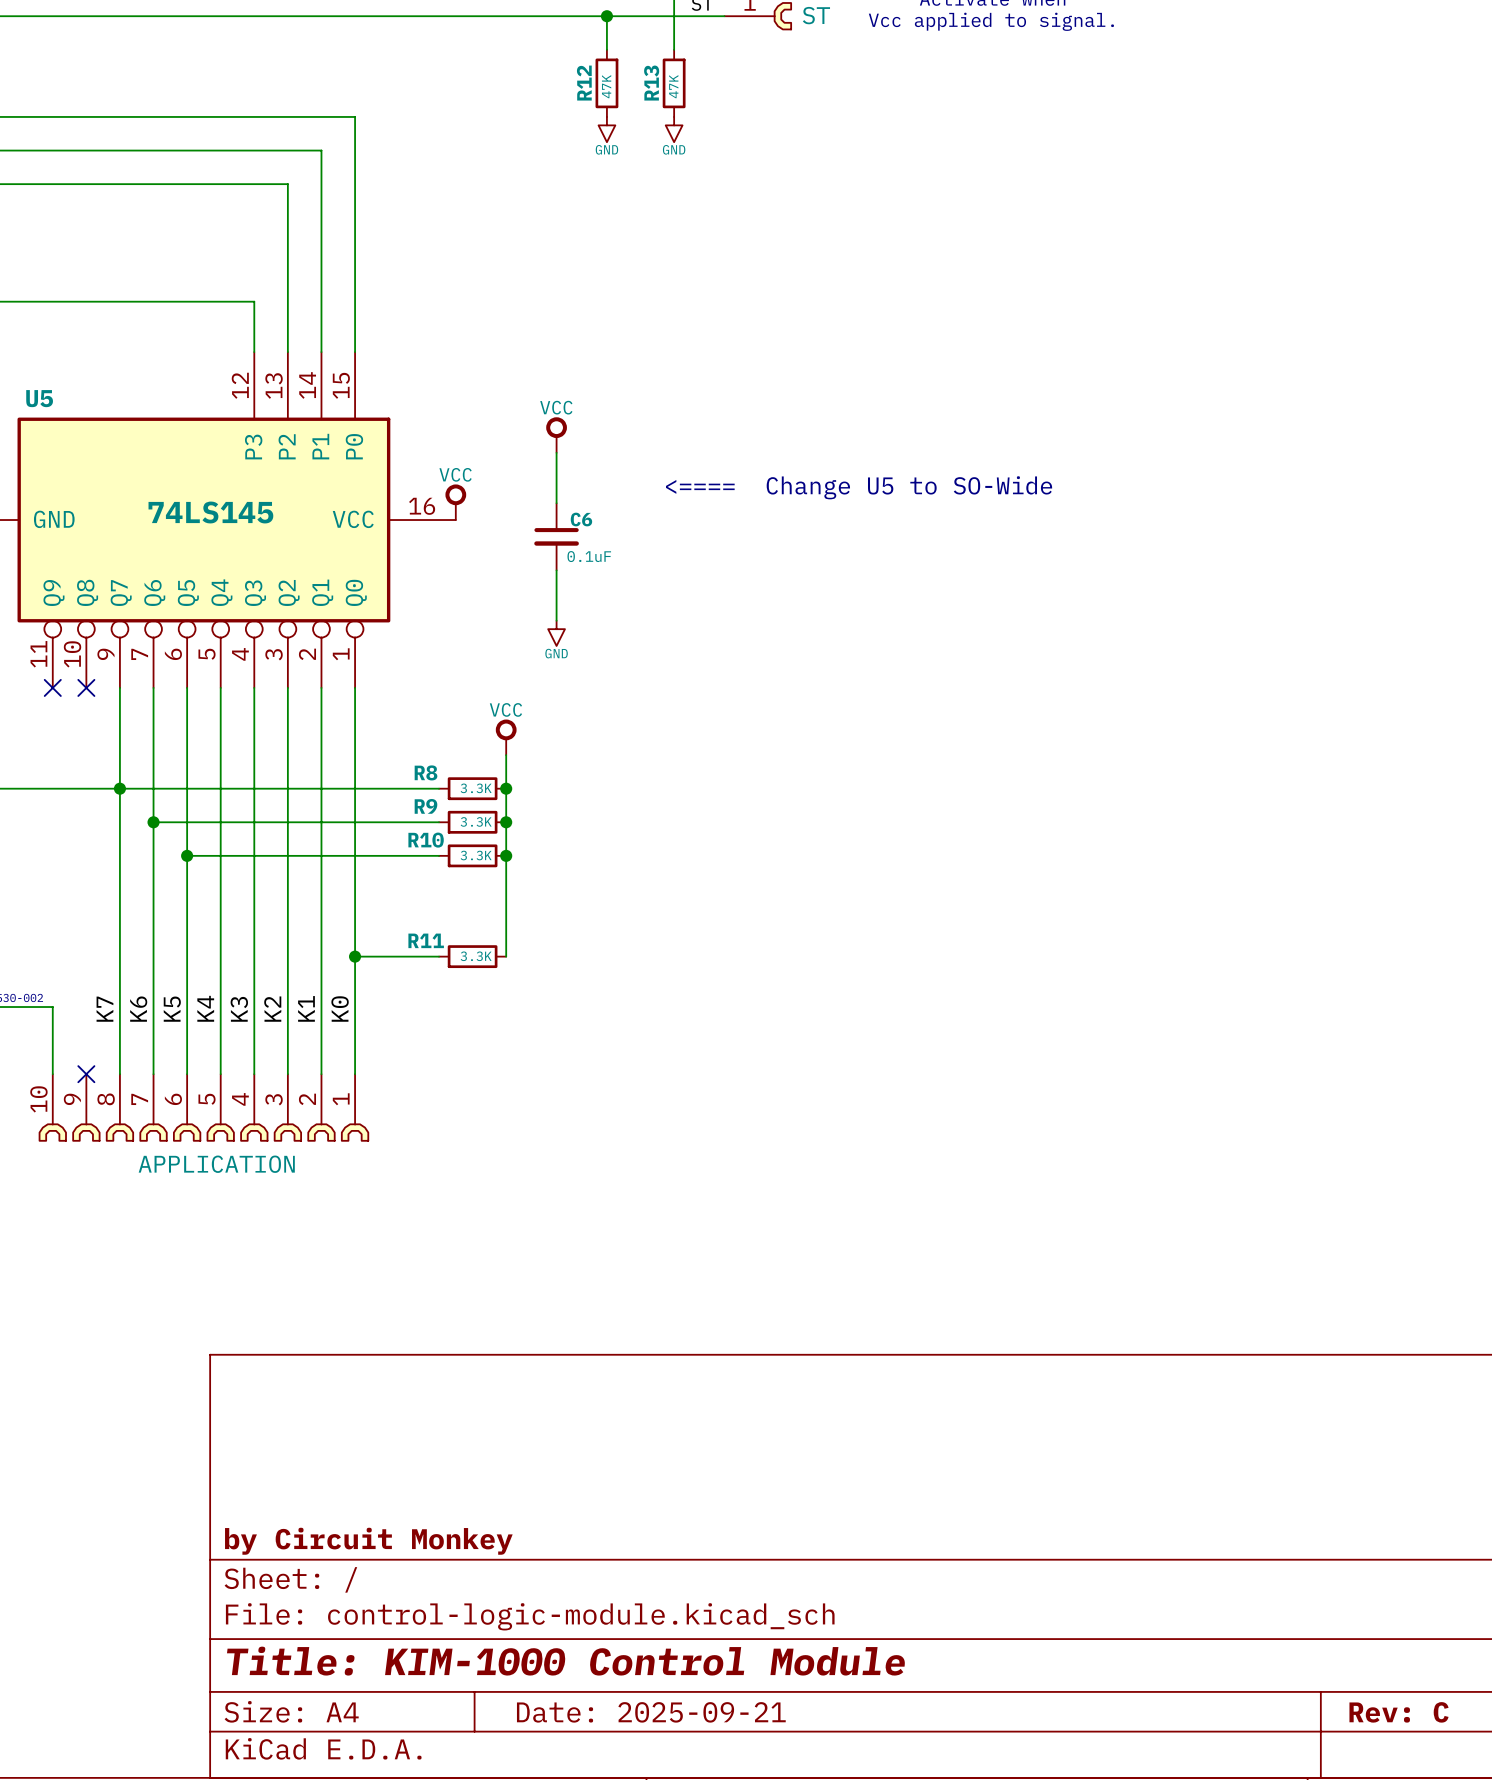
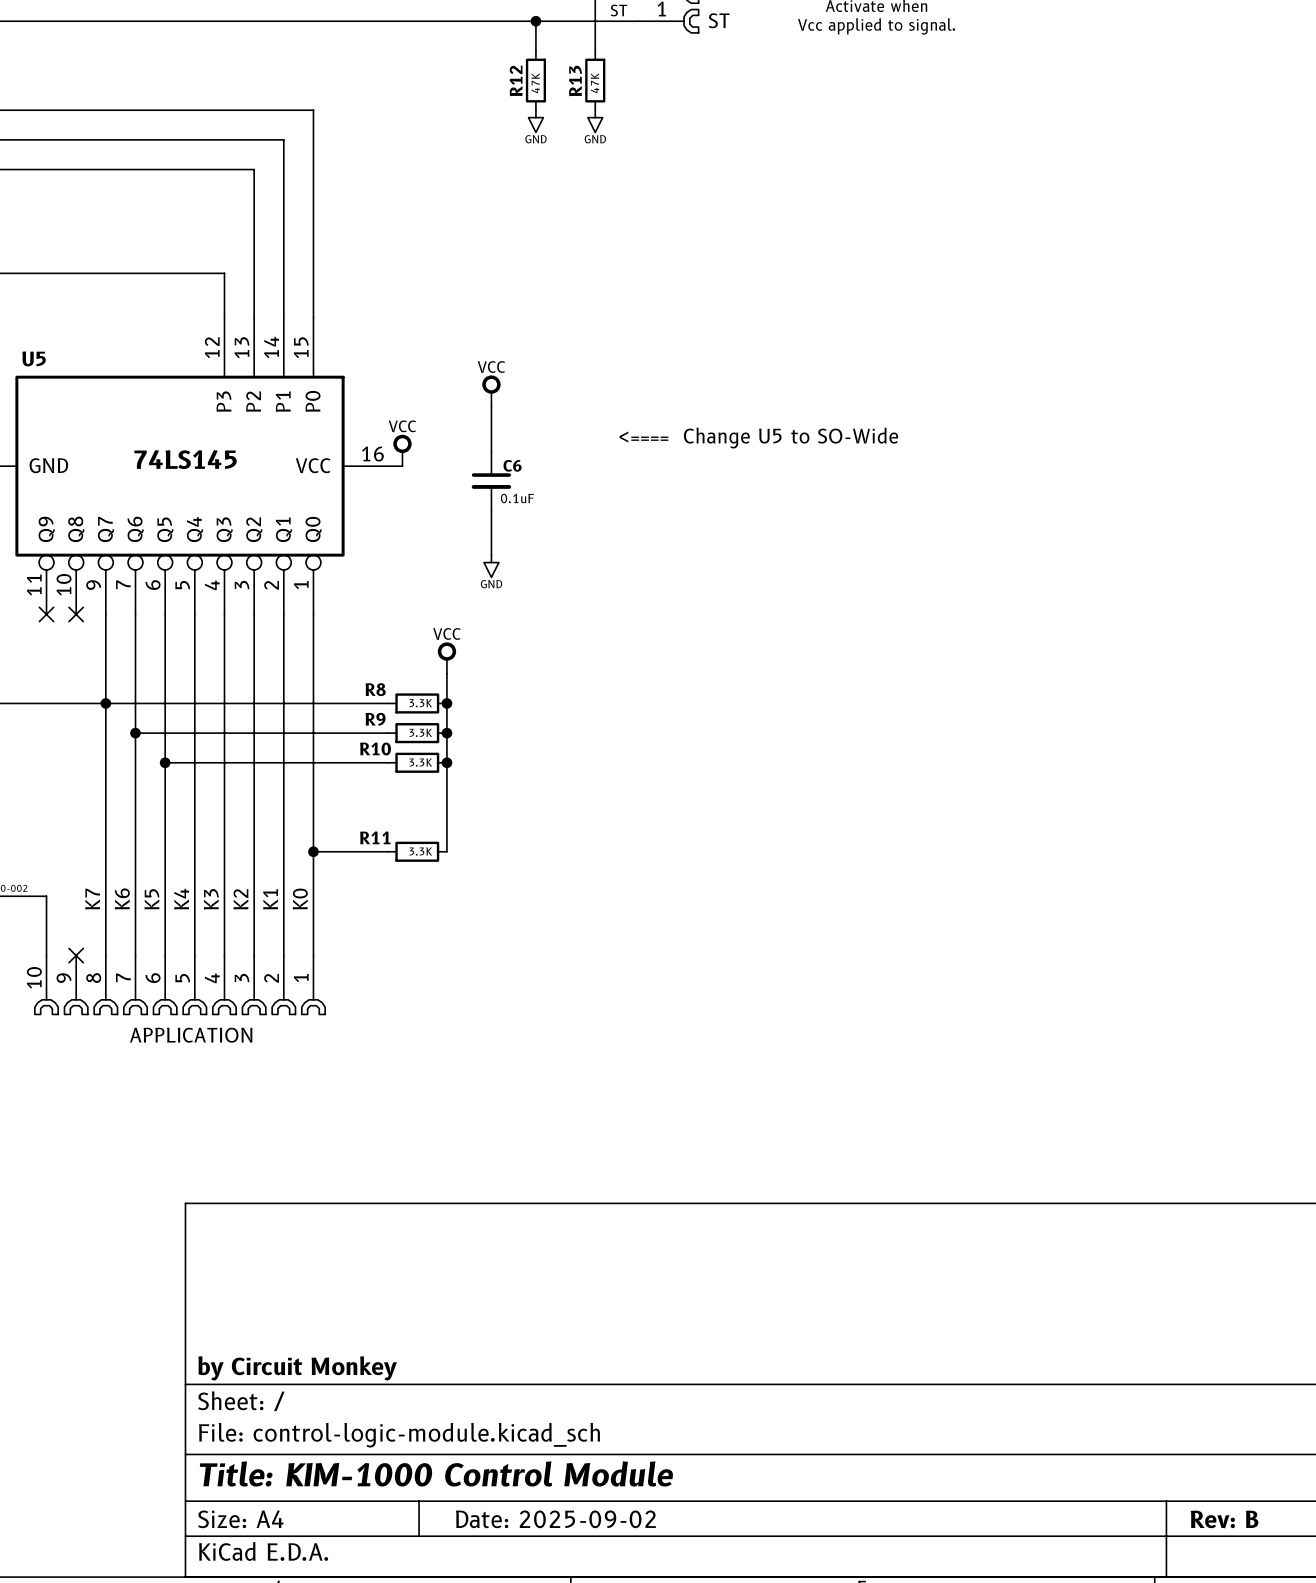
title block: Date: 2025-09-21 (651, 1712) -> Date: 2025-09-02 (555, 1519)
title block: Rev: C (1399, 1712) -> Rev: B (1224, 1519)

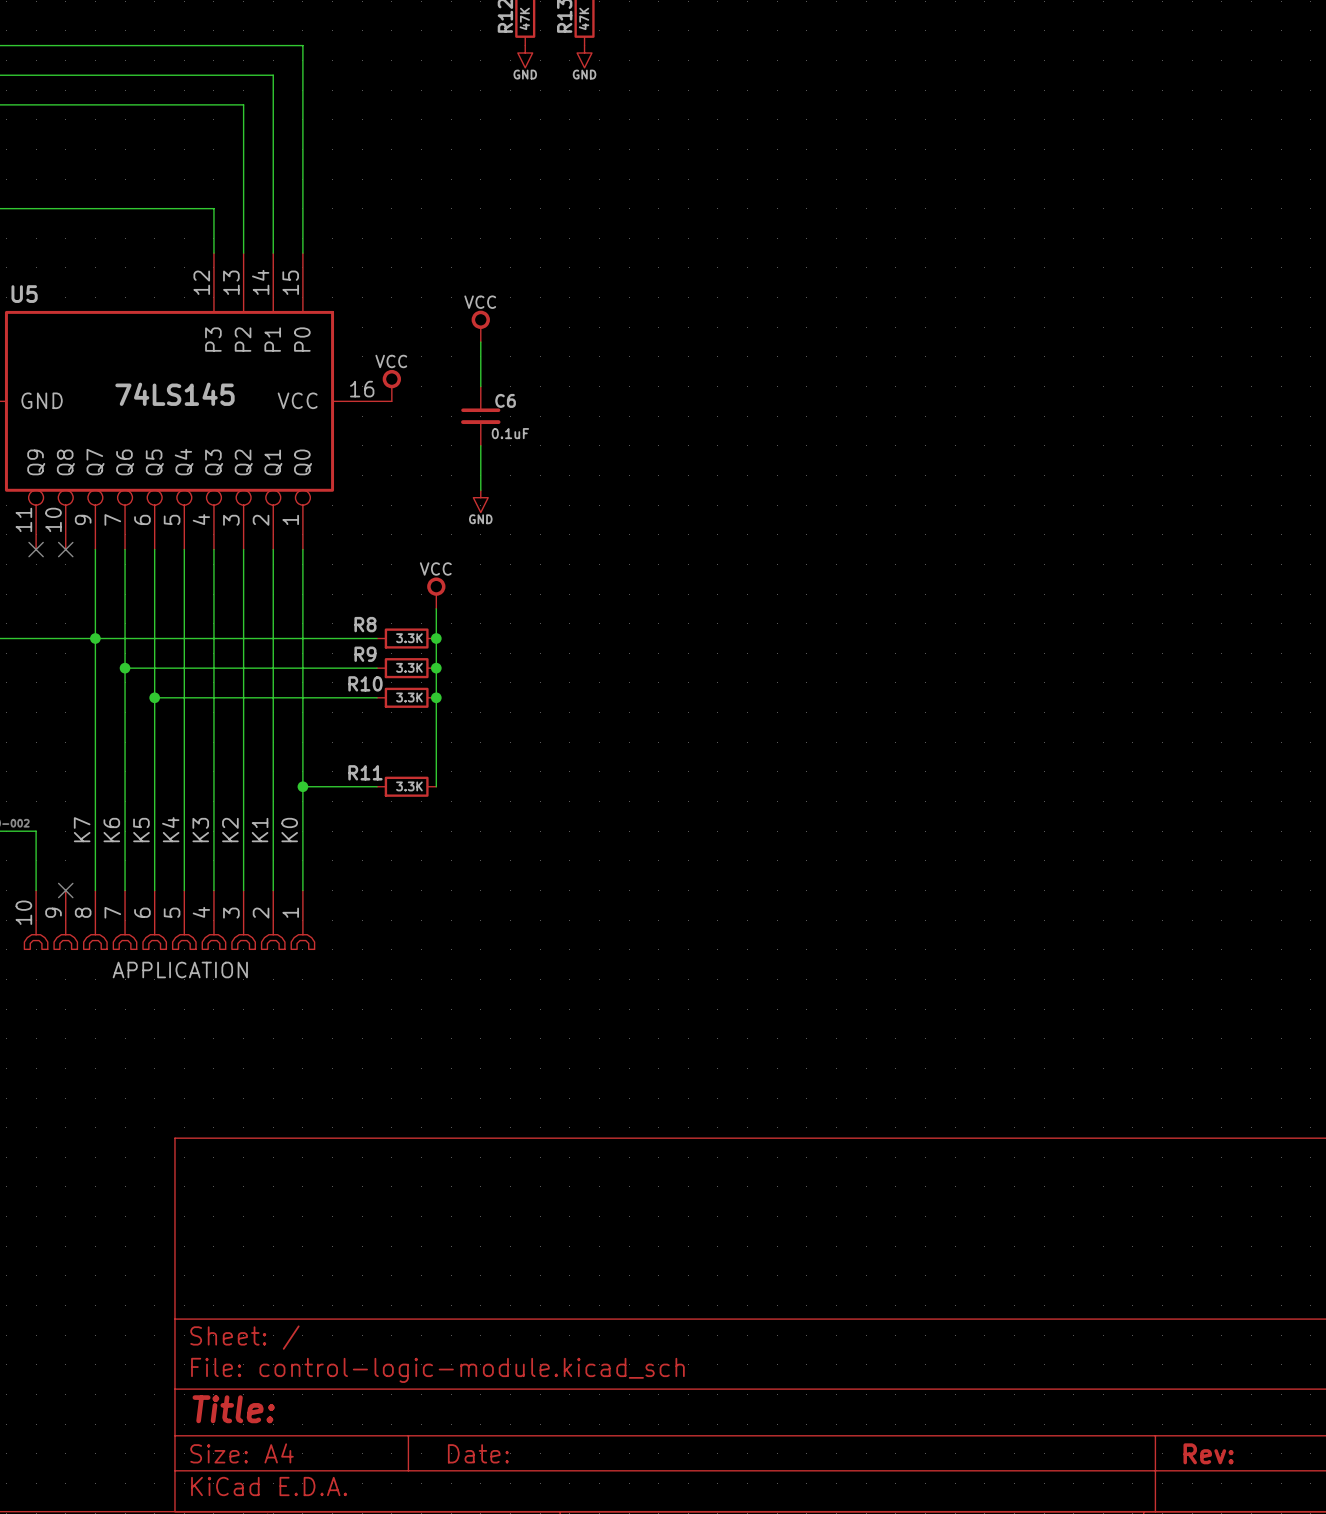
text: <==== Change U5 to SO-Wide (758, 438) -> none
title block: by Circuit Monkey (297, 1368) -> none
title block: Title: KIM-1000 Control Module (436, 1473) -> Title: (233, 1409)
title block: Date: 2025-09-02 (555, 1519) -> Date: (478, 1453)
title block: Rev: B (1224, 1519) -> Rev: (1208, 1453)

